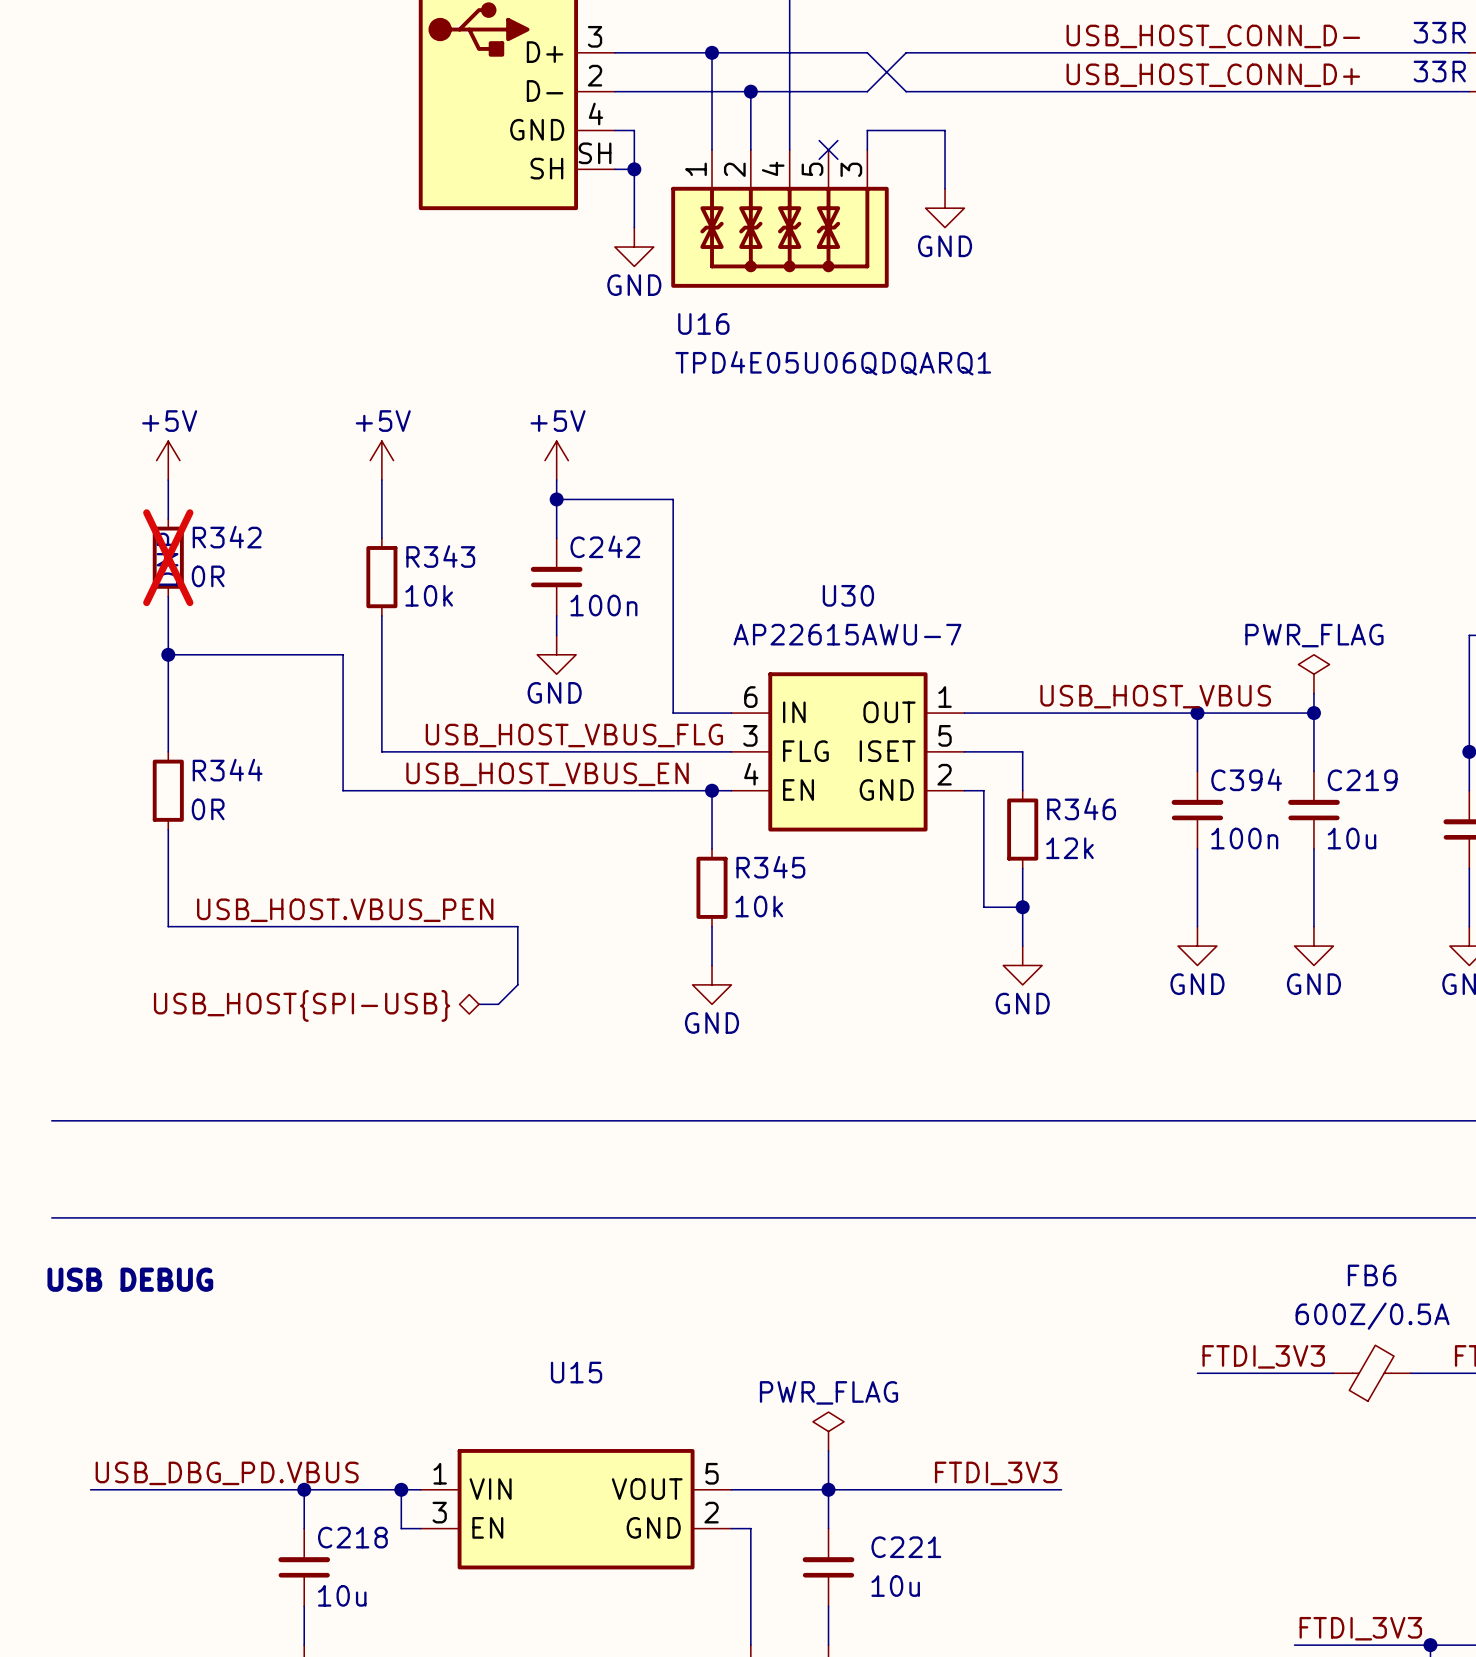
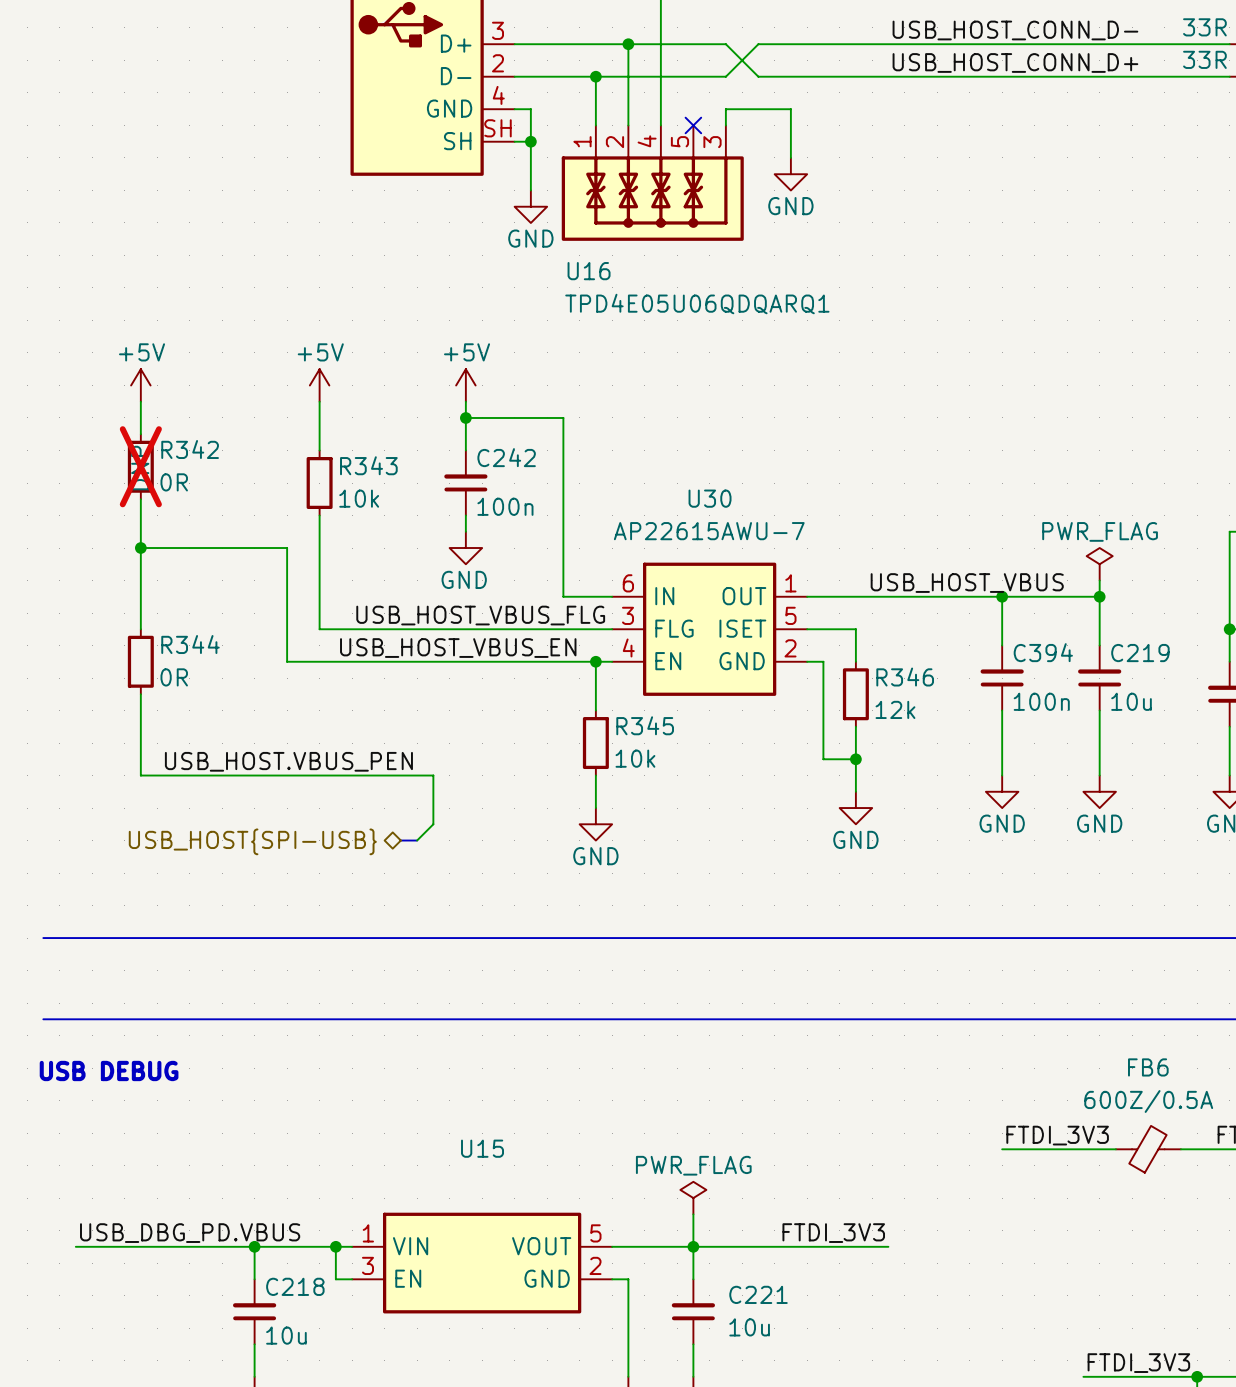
wire: (712, 52) (712, 91) -> (628, 44) (628, 76)
junction: (712, 52) -> none
junction: none -> (628, 44)
junction: none -> (595, 76)
junction: (750, 91) -> none

